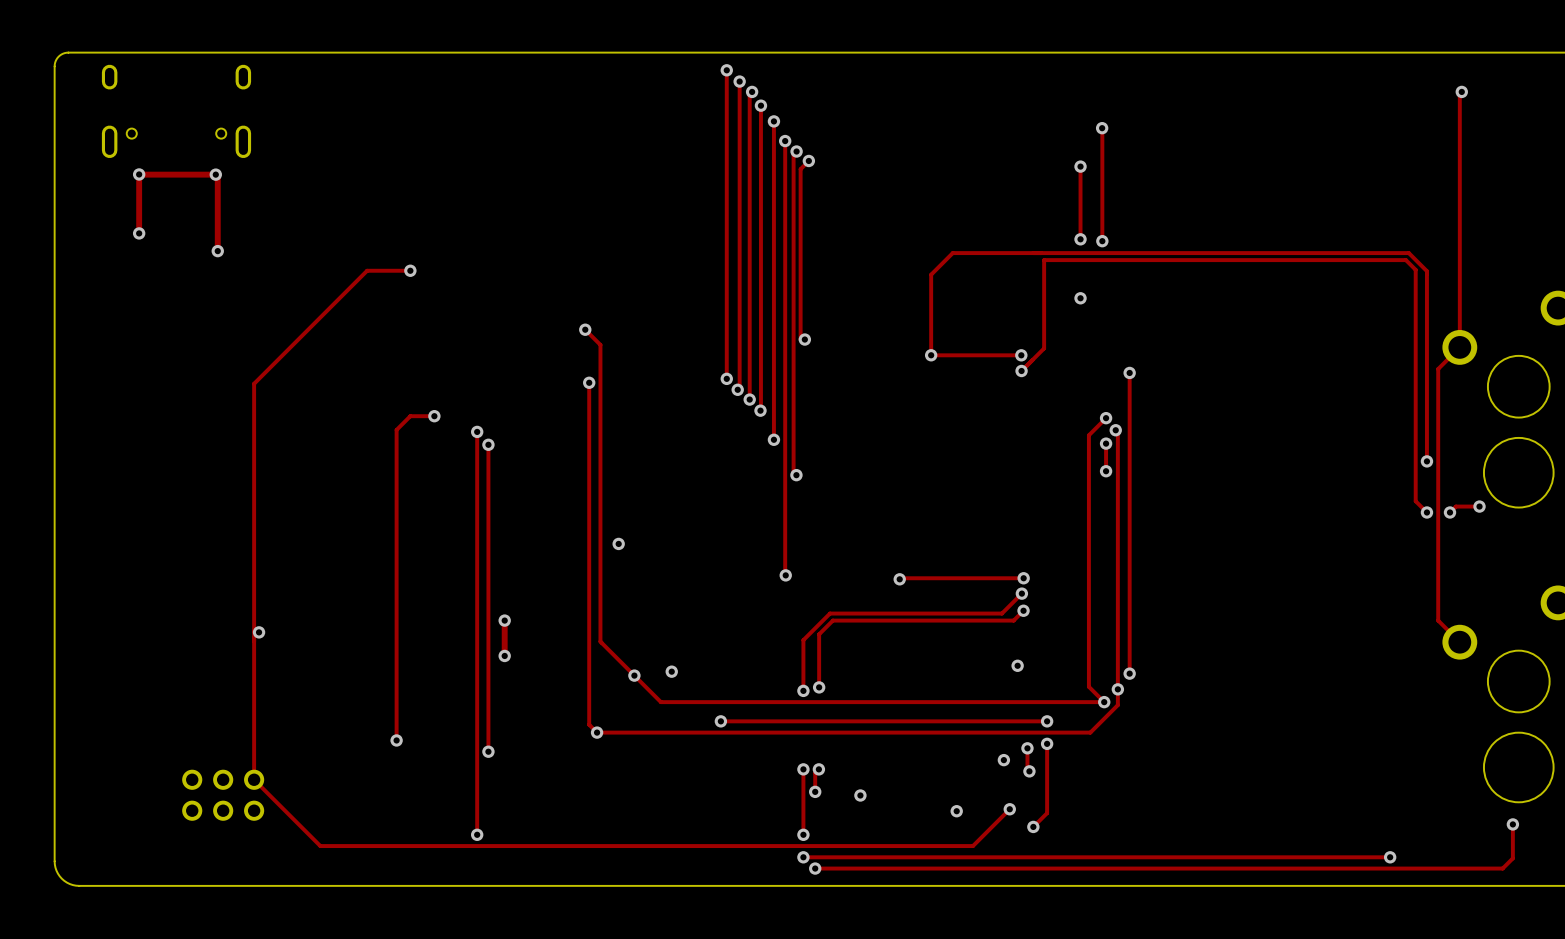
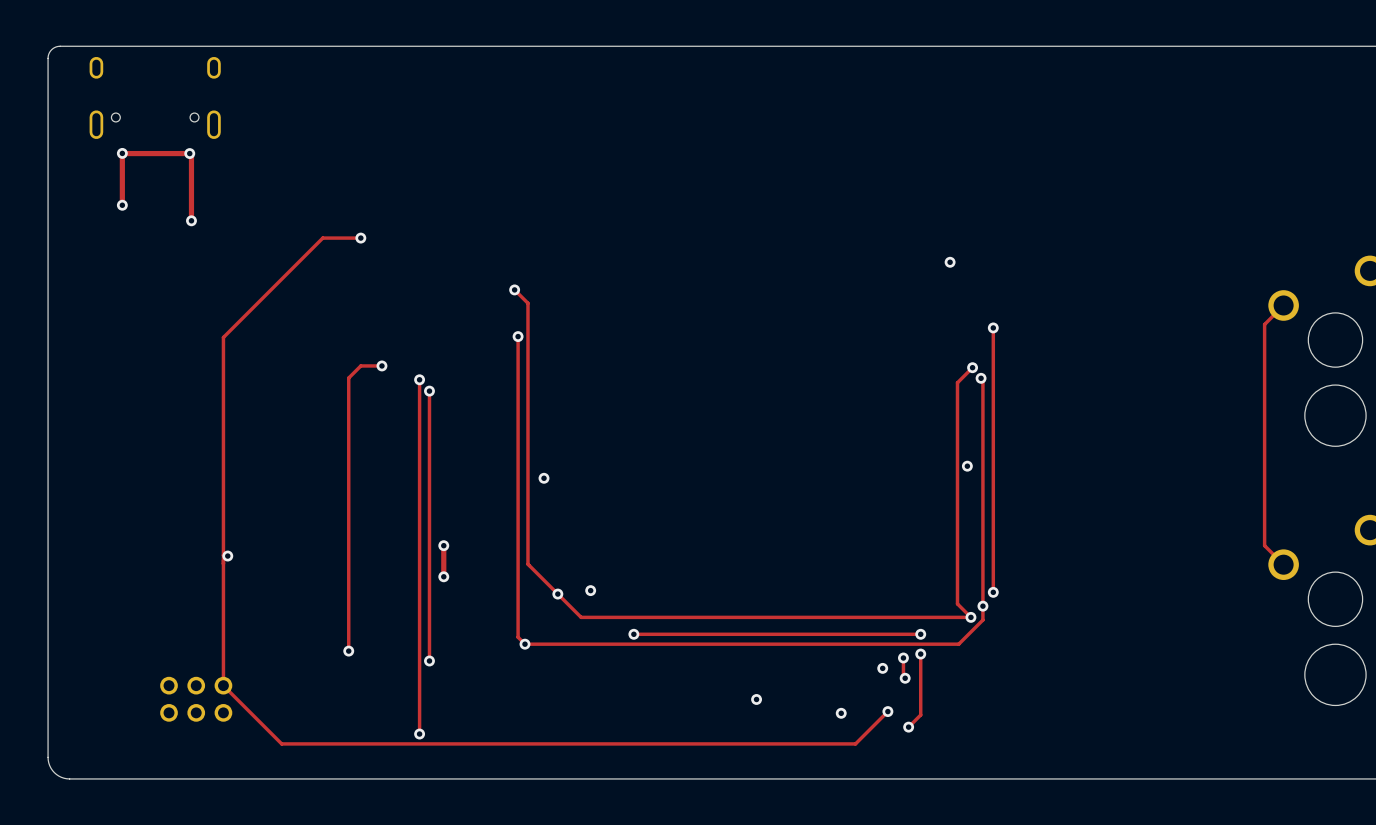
track: (726, 70) (726, 378) -> none
via: (726, 70) -> none
track: (739, 81) (739, 387) (737, 389) -> none
via: (739, 81) -> none
track: (752, 91) (749, 94) (749, 399) -> none
via: (752, 91) -> none
track: (1461, 91) (1459, 93) (1459, 347) -> none
via: (1461, 91) -> none
track: (760, 105) (760, 410) -> none
via: (760, 105) -> none
track: (773, 121) (773, 439) -> none
via: (773, 121) -> none
track: (1102, 128) (1102, 241) -> none
via: (1102, 128) -> none
track: (785, 141) (785, 575) -> none
via: (785, 141) -> none
track: (796, 151) (793, 154) (793, 472) (796, 475) -> none
via: (796, 151) -> none
track: (808, 160) (800, 169) (800, 339) (804, 339) -> none
via: (808, 160) -> none
track: (1080, 166) (1080, 239) -> none
via: (1080, 166) -> none
via: (1080, 239) -> none
via: (1102, 241) -> none
via: (804, 339) -> none
via: (931, 355) -> none
track: (1021, 355) (931, 355) (931, 274) (952, 253) (1408, 253) (1426, 271) (1426, 461) -> none
via: (1021, 355) -> none
track: (1021, 370) (1044, 348) (1044, 260) (1405, 260) (1415, 269) (1415, 501) (1426, 512) -> none
via: (1021, 370) -> none
via: (726, 378) -> none
via: (737, 389) -> none
via: (749, 399) -> none
via: (760, 410) -> none
via: (773, 439) -> none
track: (1106, 443) (1106, 471) -> none
via: (1106, 443) -> none
via: (1426, 461) -> none
via: (1106, 471) -> none
via: (796, 475) -> none
track: (1479, 506) (1455, 506) (1449, 512) -> none
via: (1479, 506) -> none
via: (1426, 512) -> none
via: (1449, 512) -> none
via: none -> (967, 466)
via: (785, 575) -> none
track: (1023, 578) (899, 579) -> none
via: (1023, 578) -> none
via: (899, 579) -> none
track: (1021, 593) (1001, 613) (829, 613) (803, 640) (803, 690) -> none
via: (1021, 593) -> none
track: (1023, 610) (1013, 620) (832, 620) (819, 634) (819, 687) -> none
via: (1023, 610) -> none
via: (1017, 665) -> none
via: (819, 687) -> none
via: (803, 690) -> none
track: (803, 769) (803, 834) -> none
via: (803, 769) -> none
track: (818, 769) (815, 773) (815, 791) -> none
via: (818, 769) -> none
via: (815, 791) -> none
track: (1512, 824) (1512, 858) (1502, 868) (815, 868) -> none
via: (1512, 824) -> none
via: (803, 834) -> none
track: (803, 857) (1390, 857) -> none
via: (803, 857) -> none
via: (1390, 857) -> none
via: (815, 868) -> none

